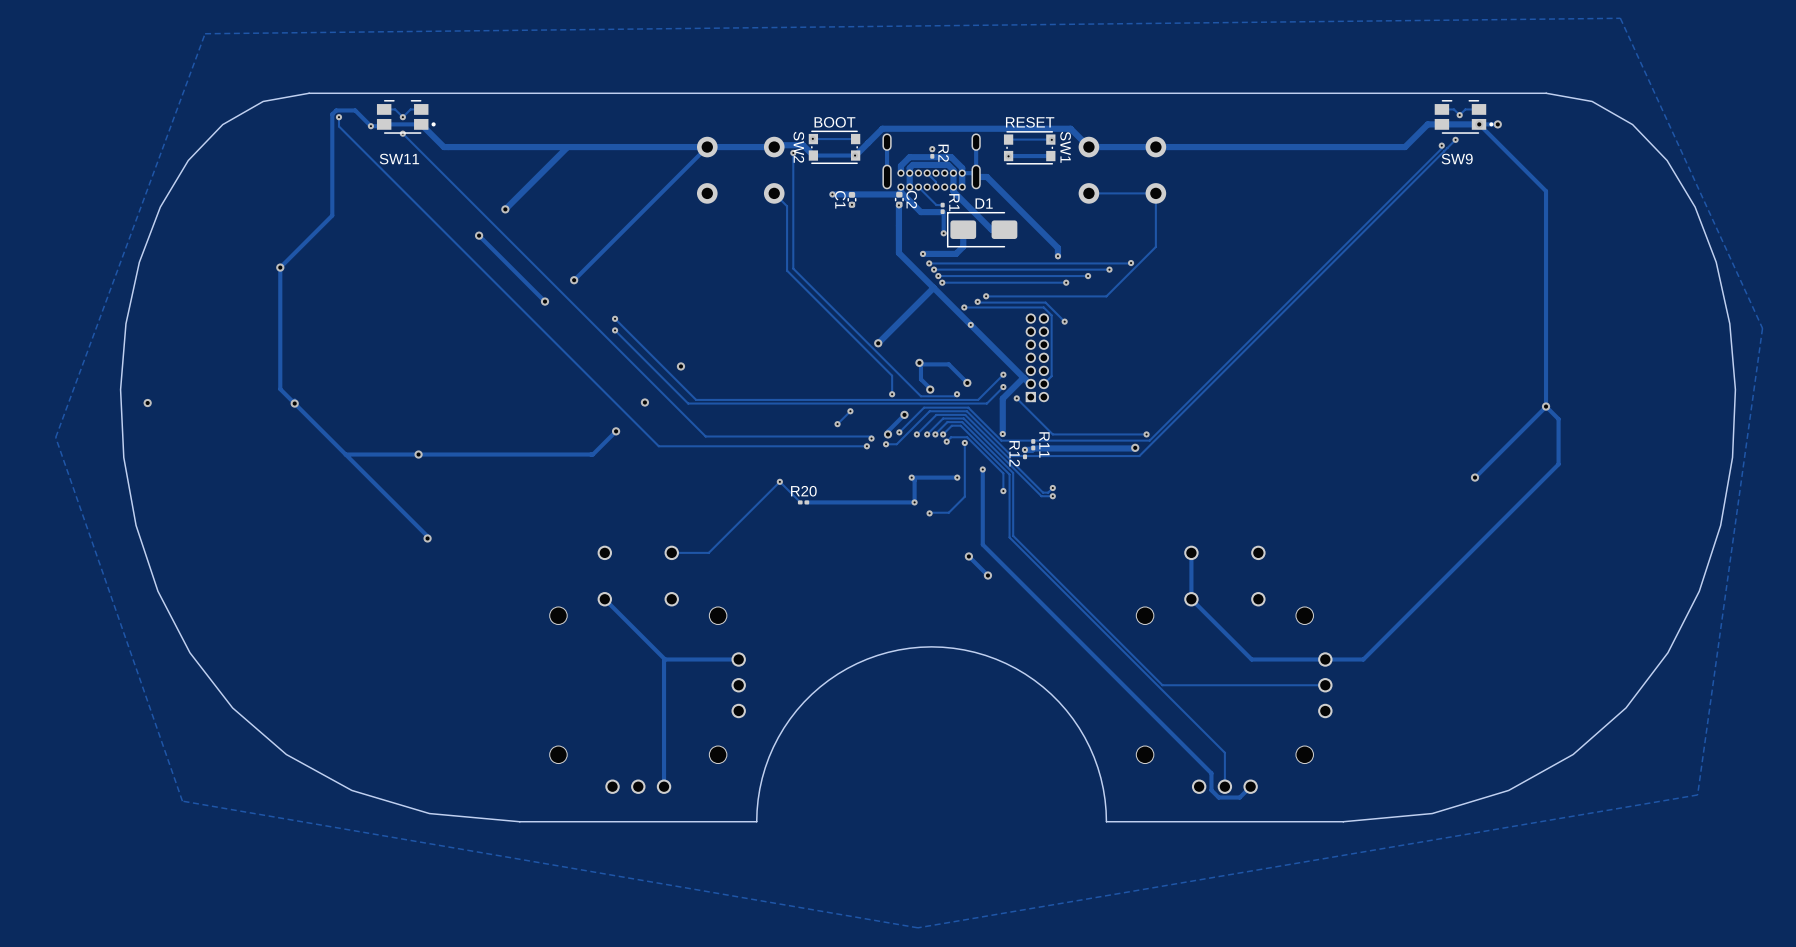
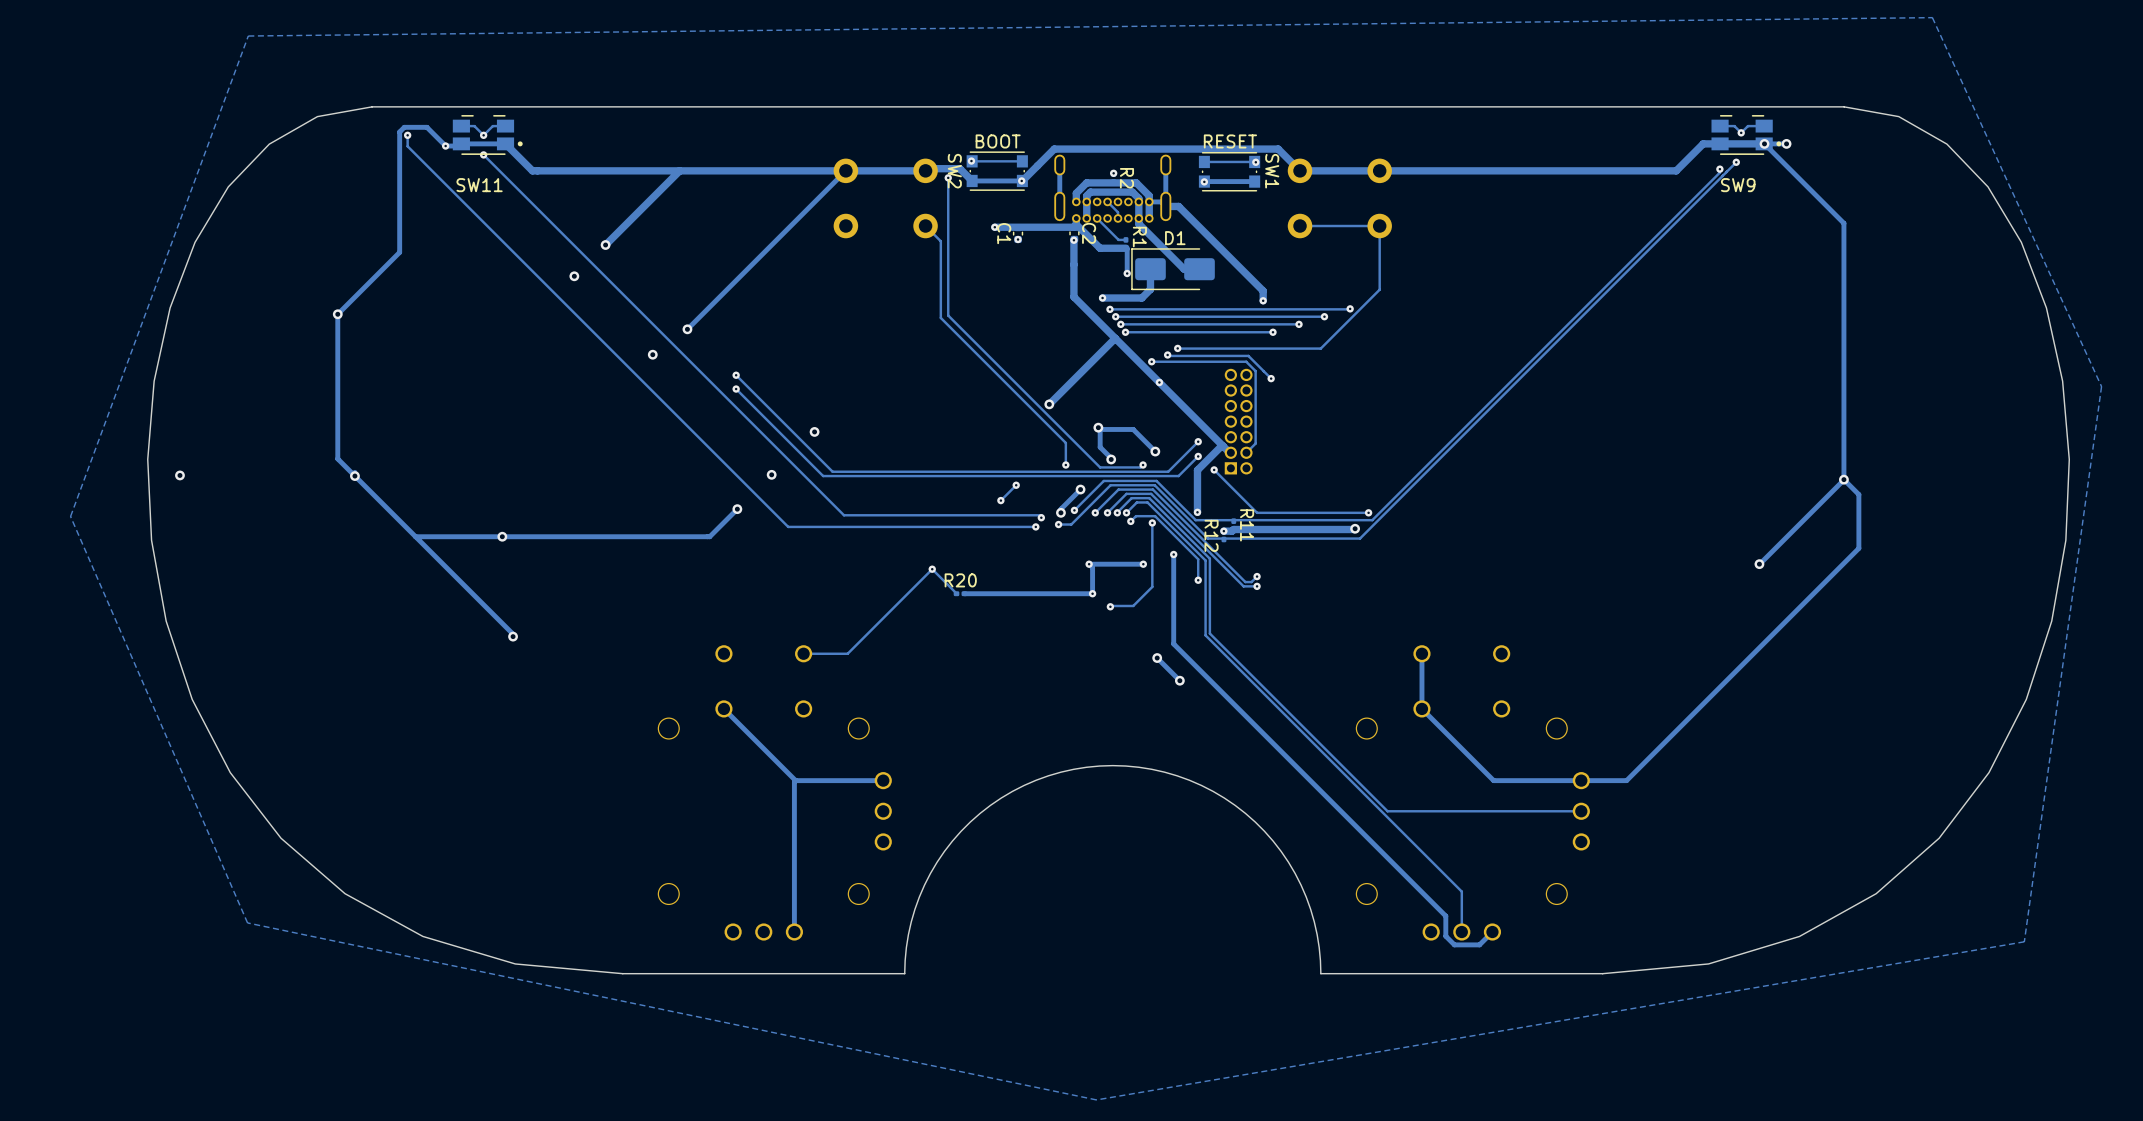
track: (479, 235) (545, 301) -> none
zone outline: (55, 437) (182, 801) (917, 927) -> (70, 516) (247, 922) (1096, 1099)

